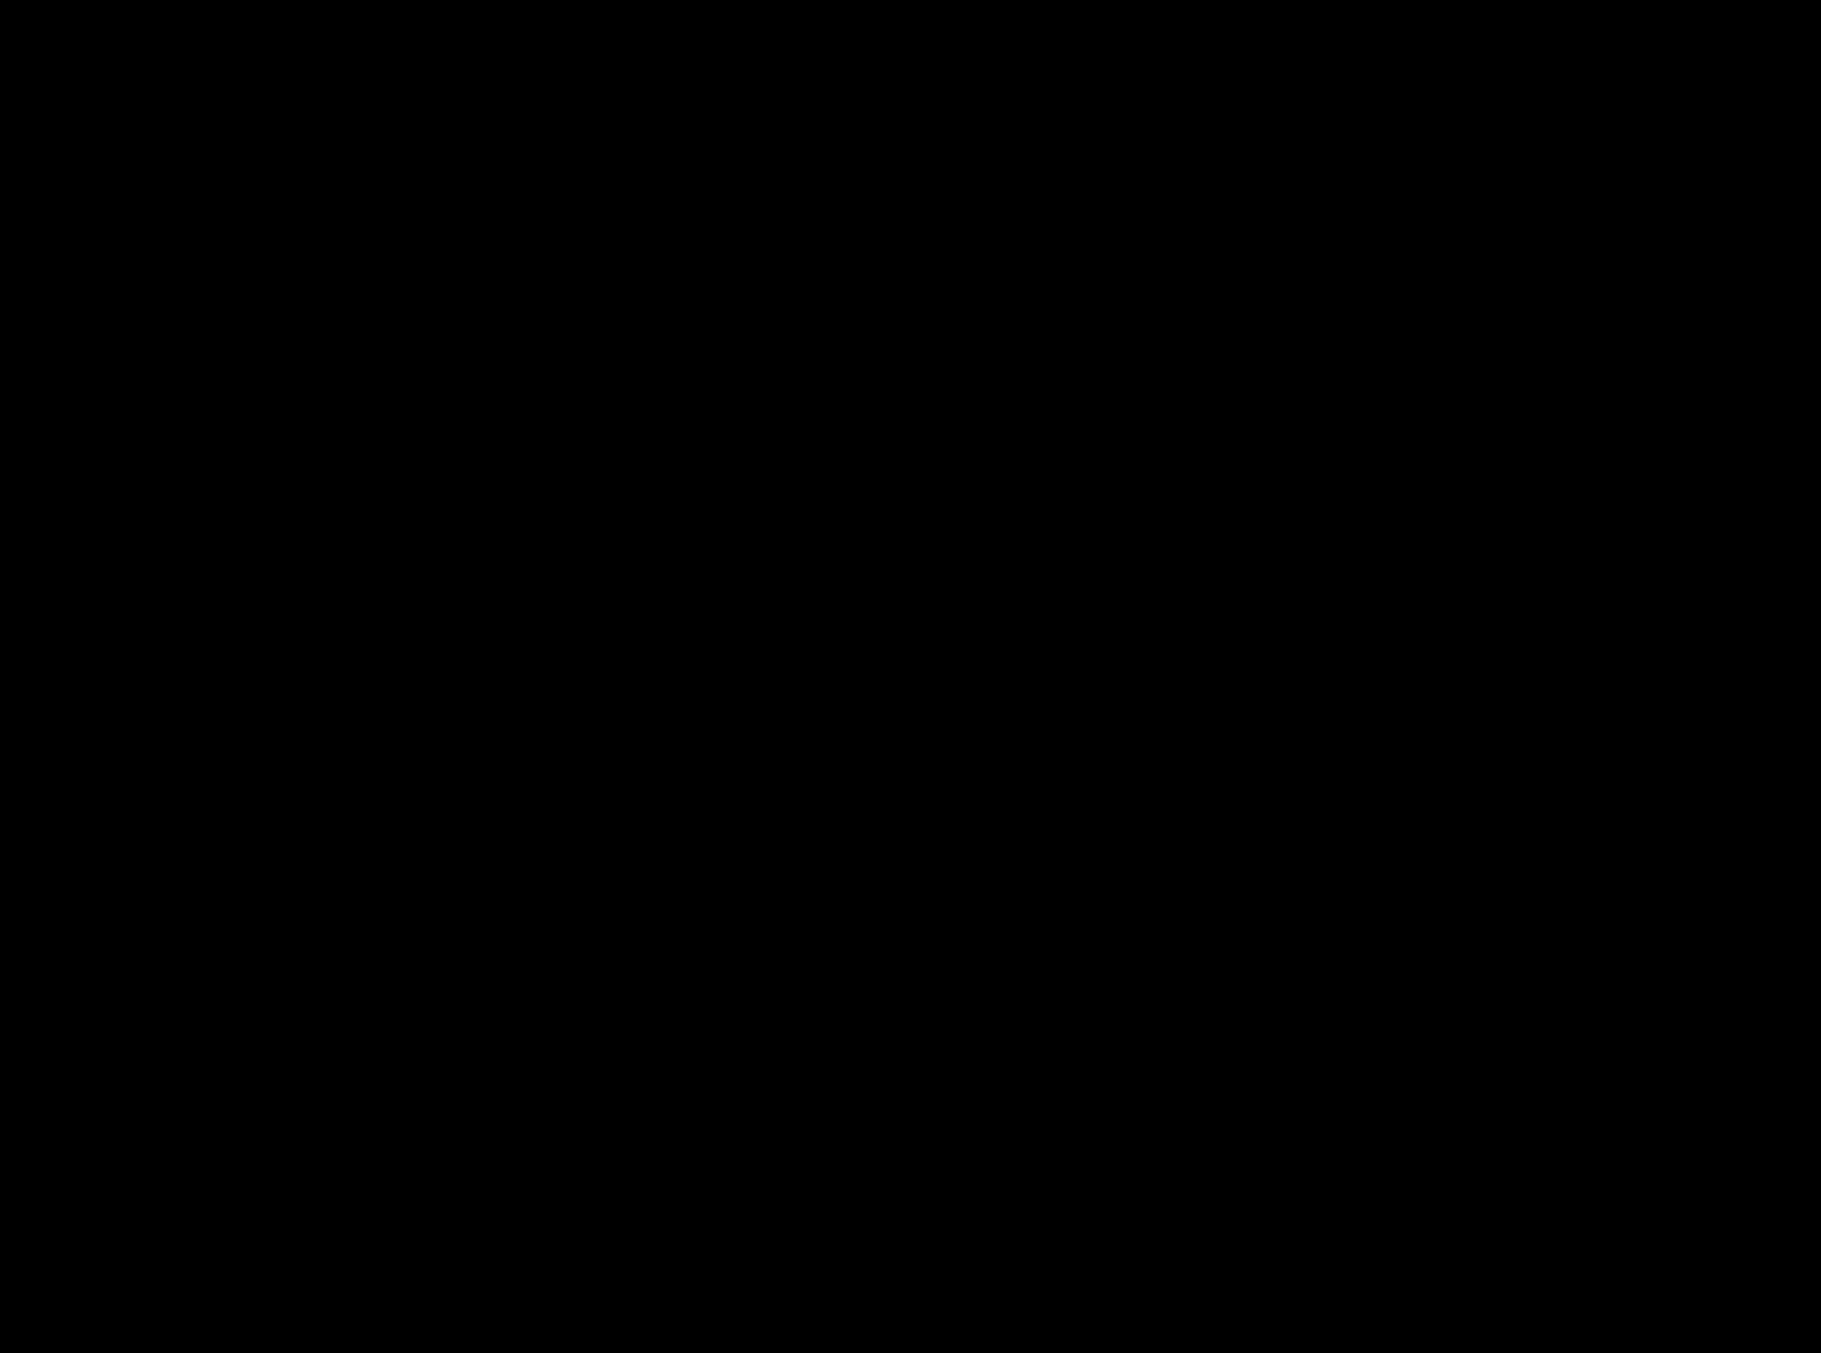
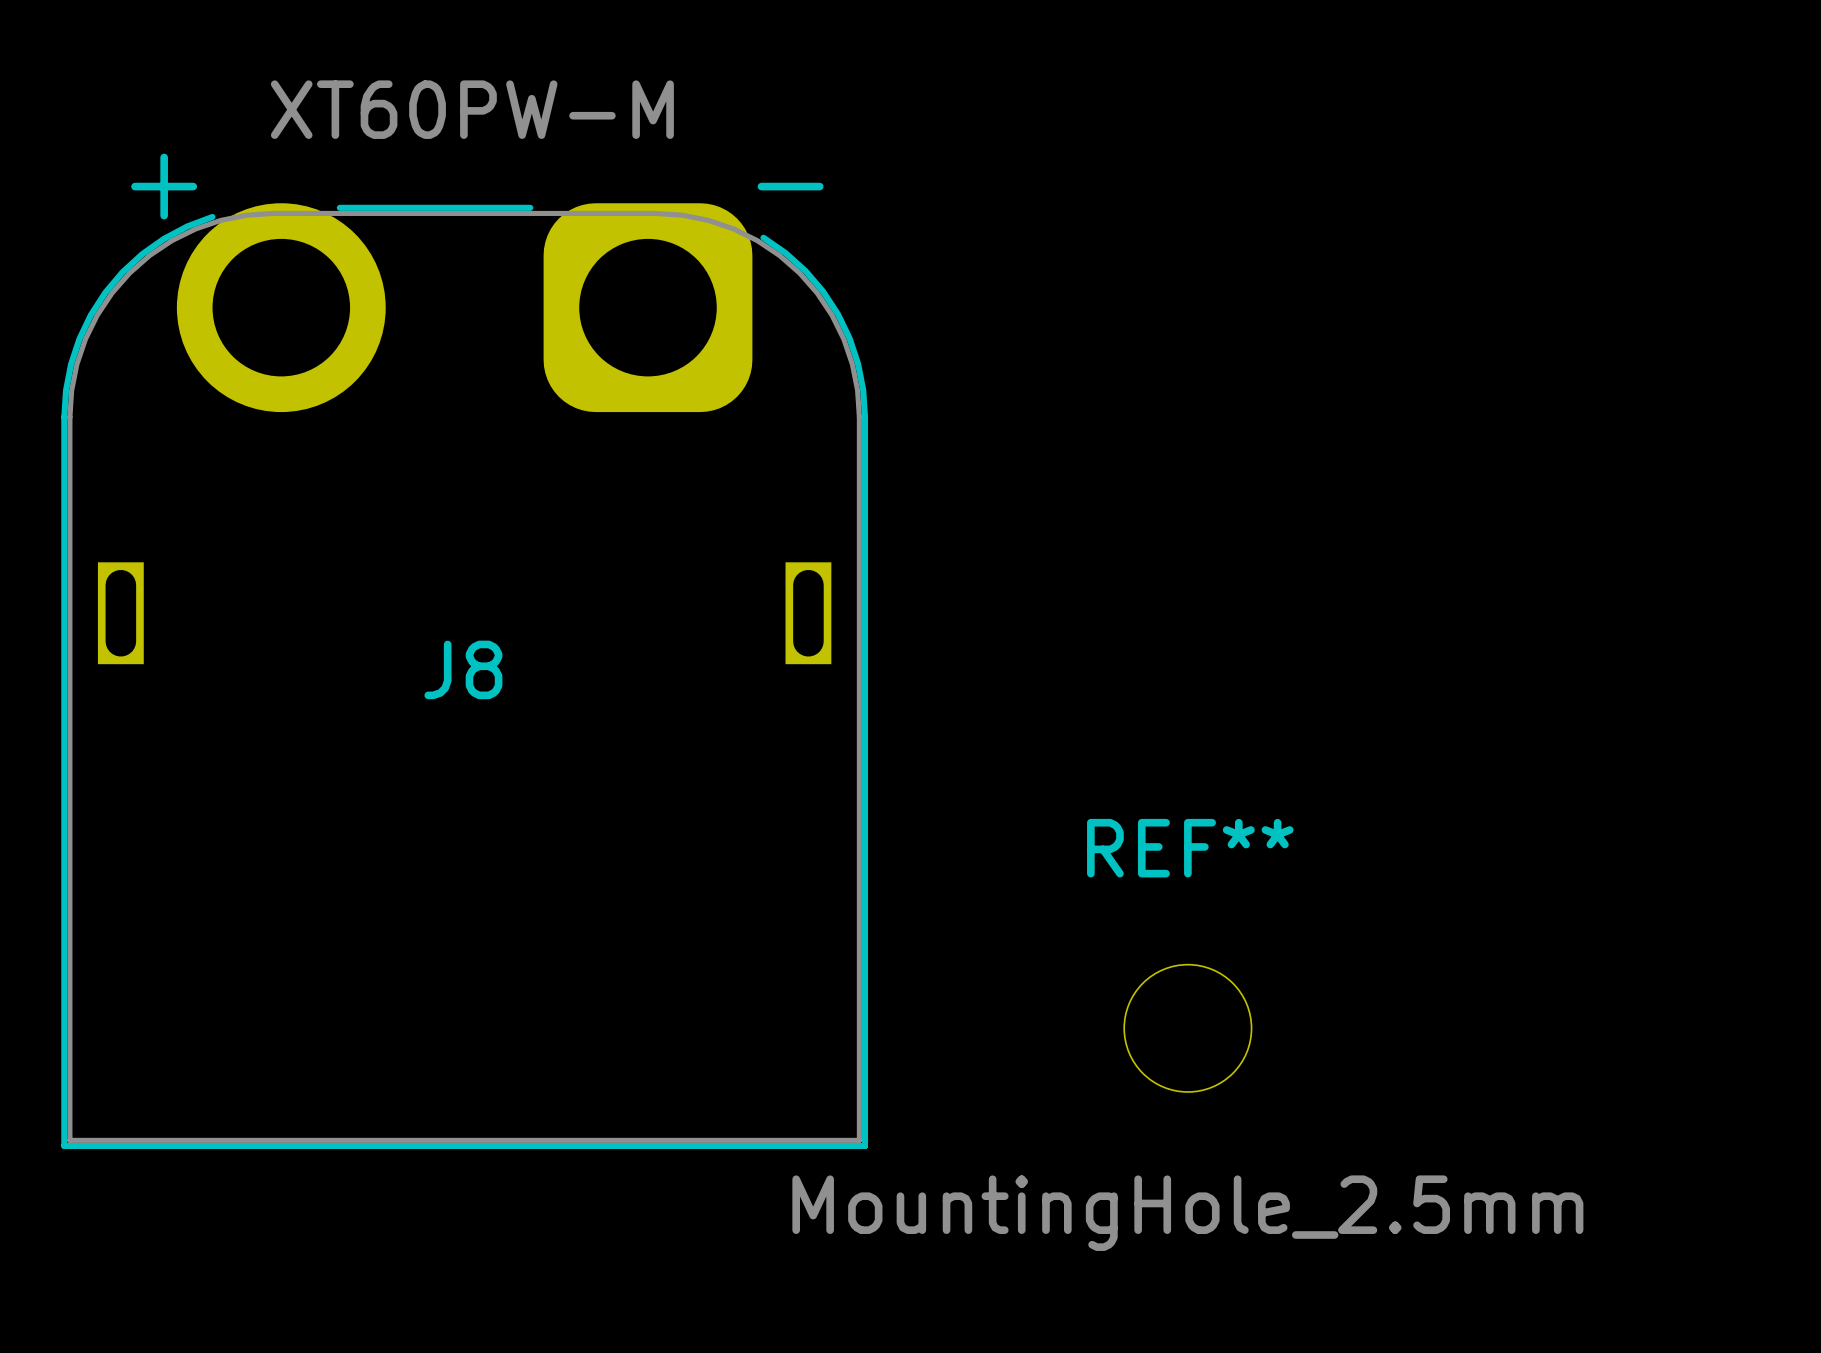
J8: none -> XT60PW-M (464, 676)
REF**: none -> MountingHole_2.5mm (1187, 1028)

